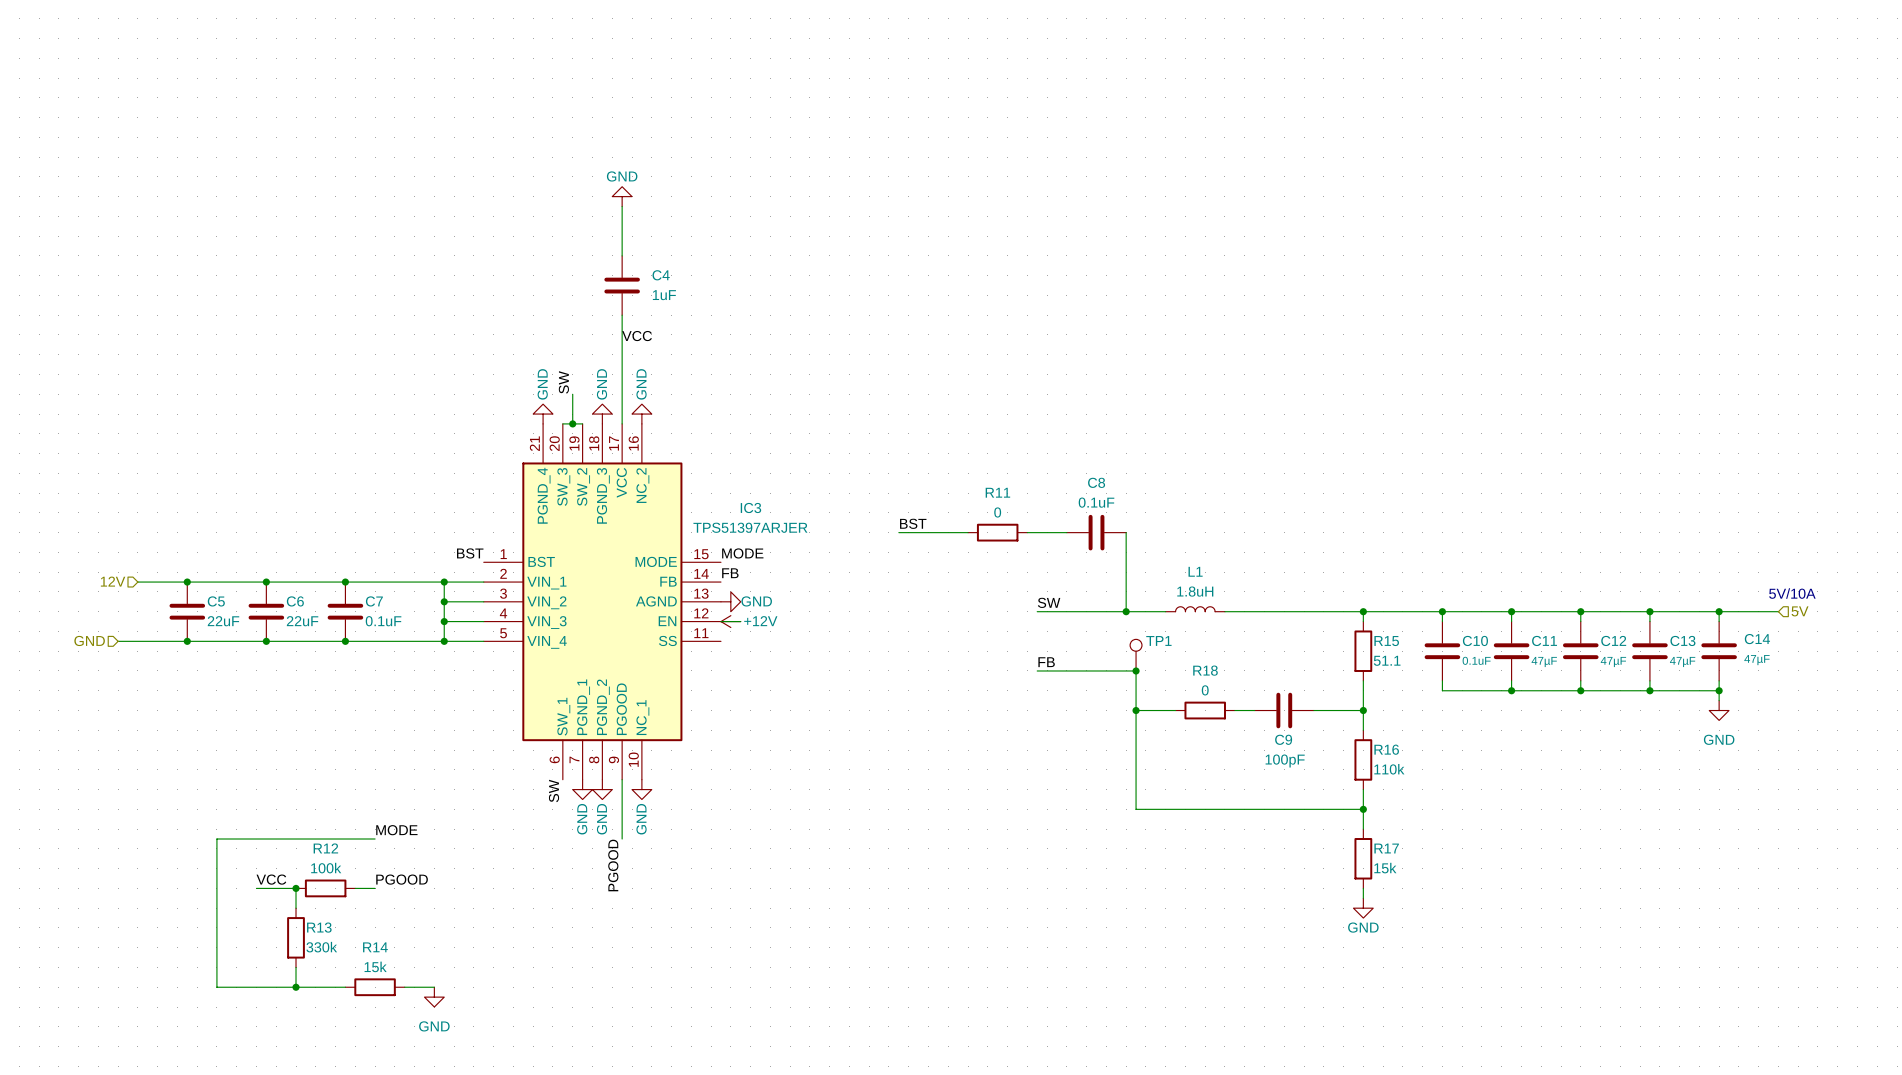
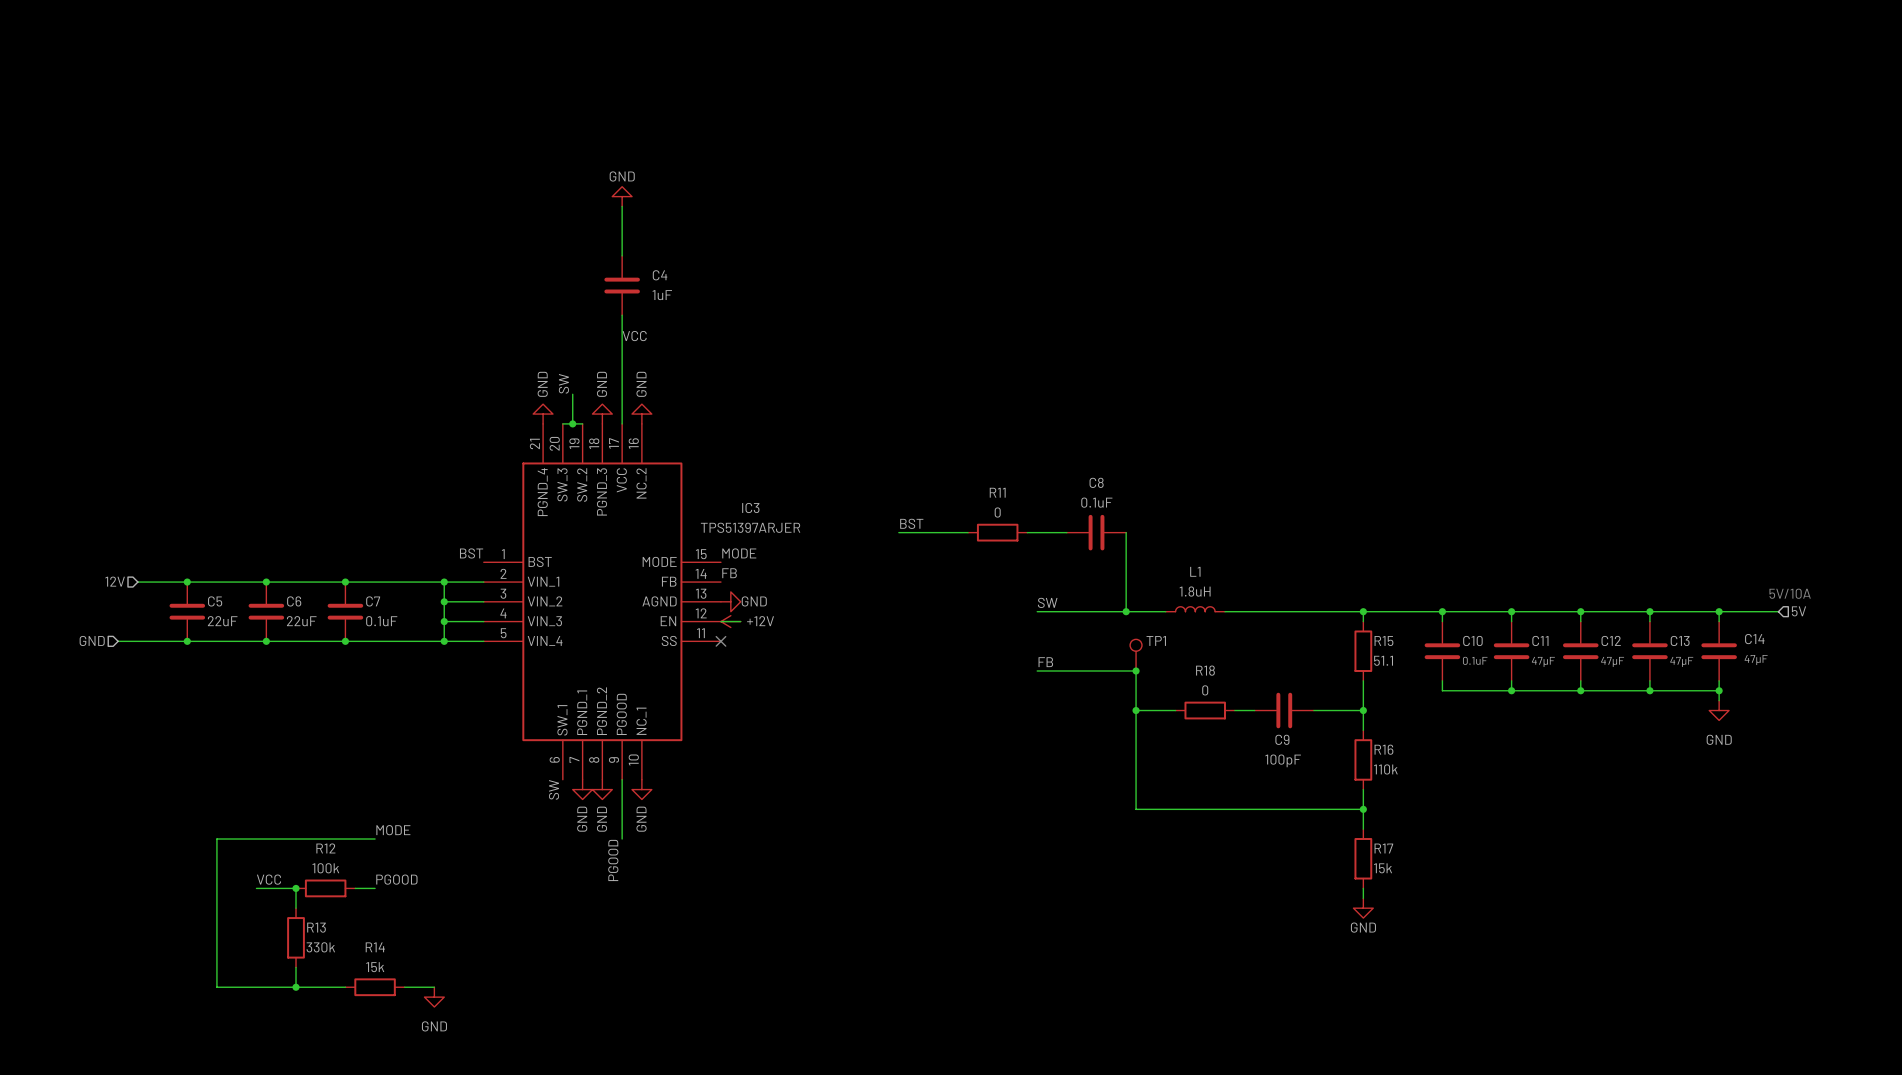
no-connect mark: none -> (720, 641)

